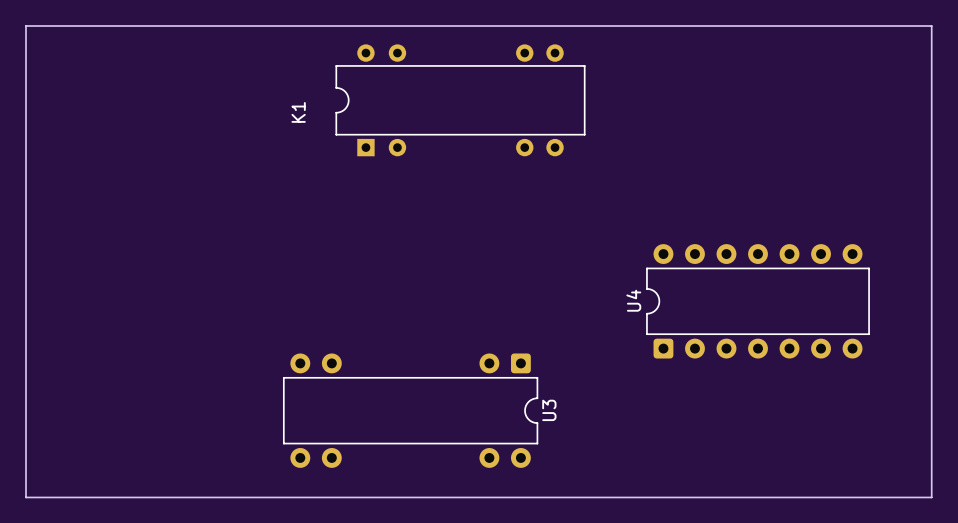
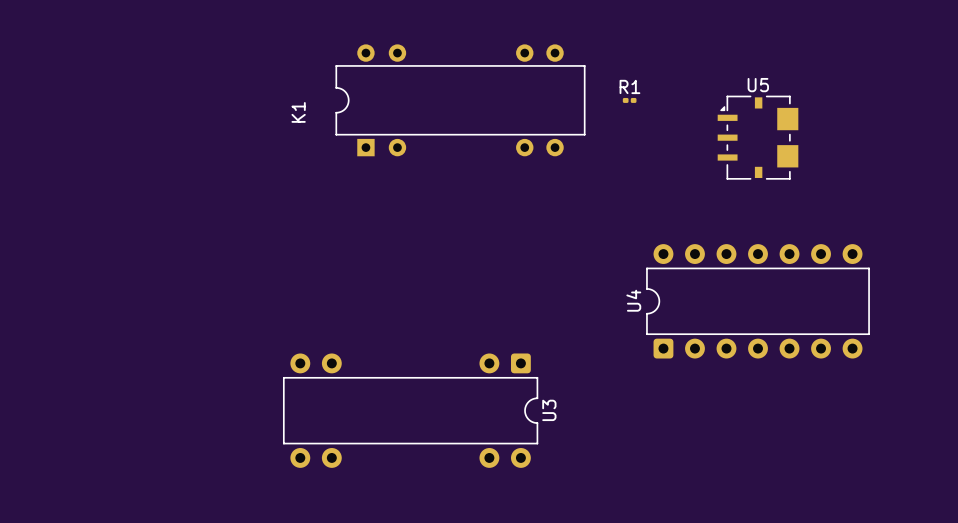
board edge: (26, 26) (931, 26) (931, 497) (26, 497) (26, 26) -> none
R1: none -> (629, 100)
U5: none -> (758, 137)

